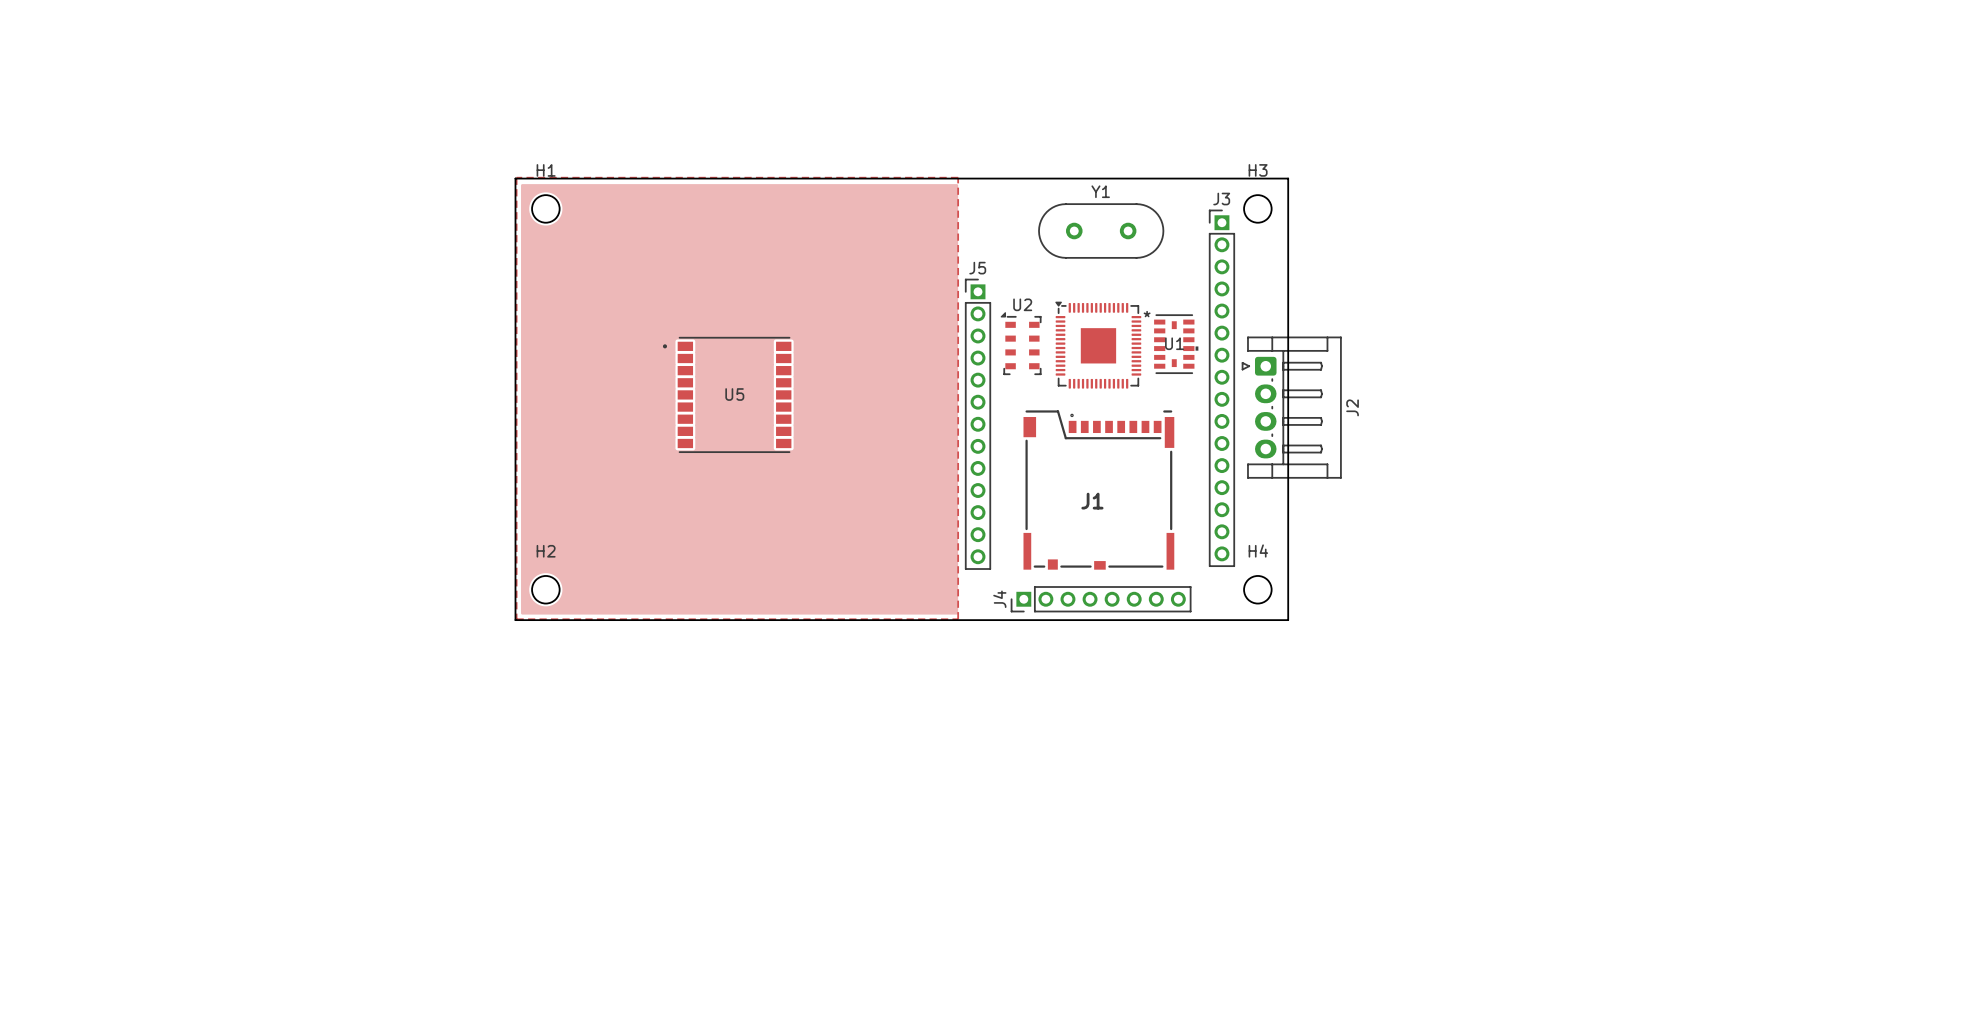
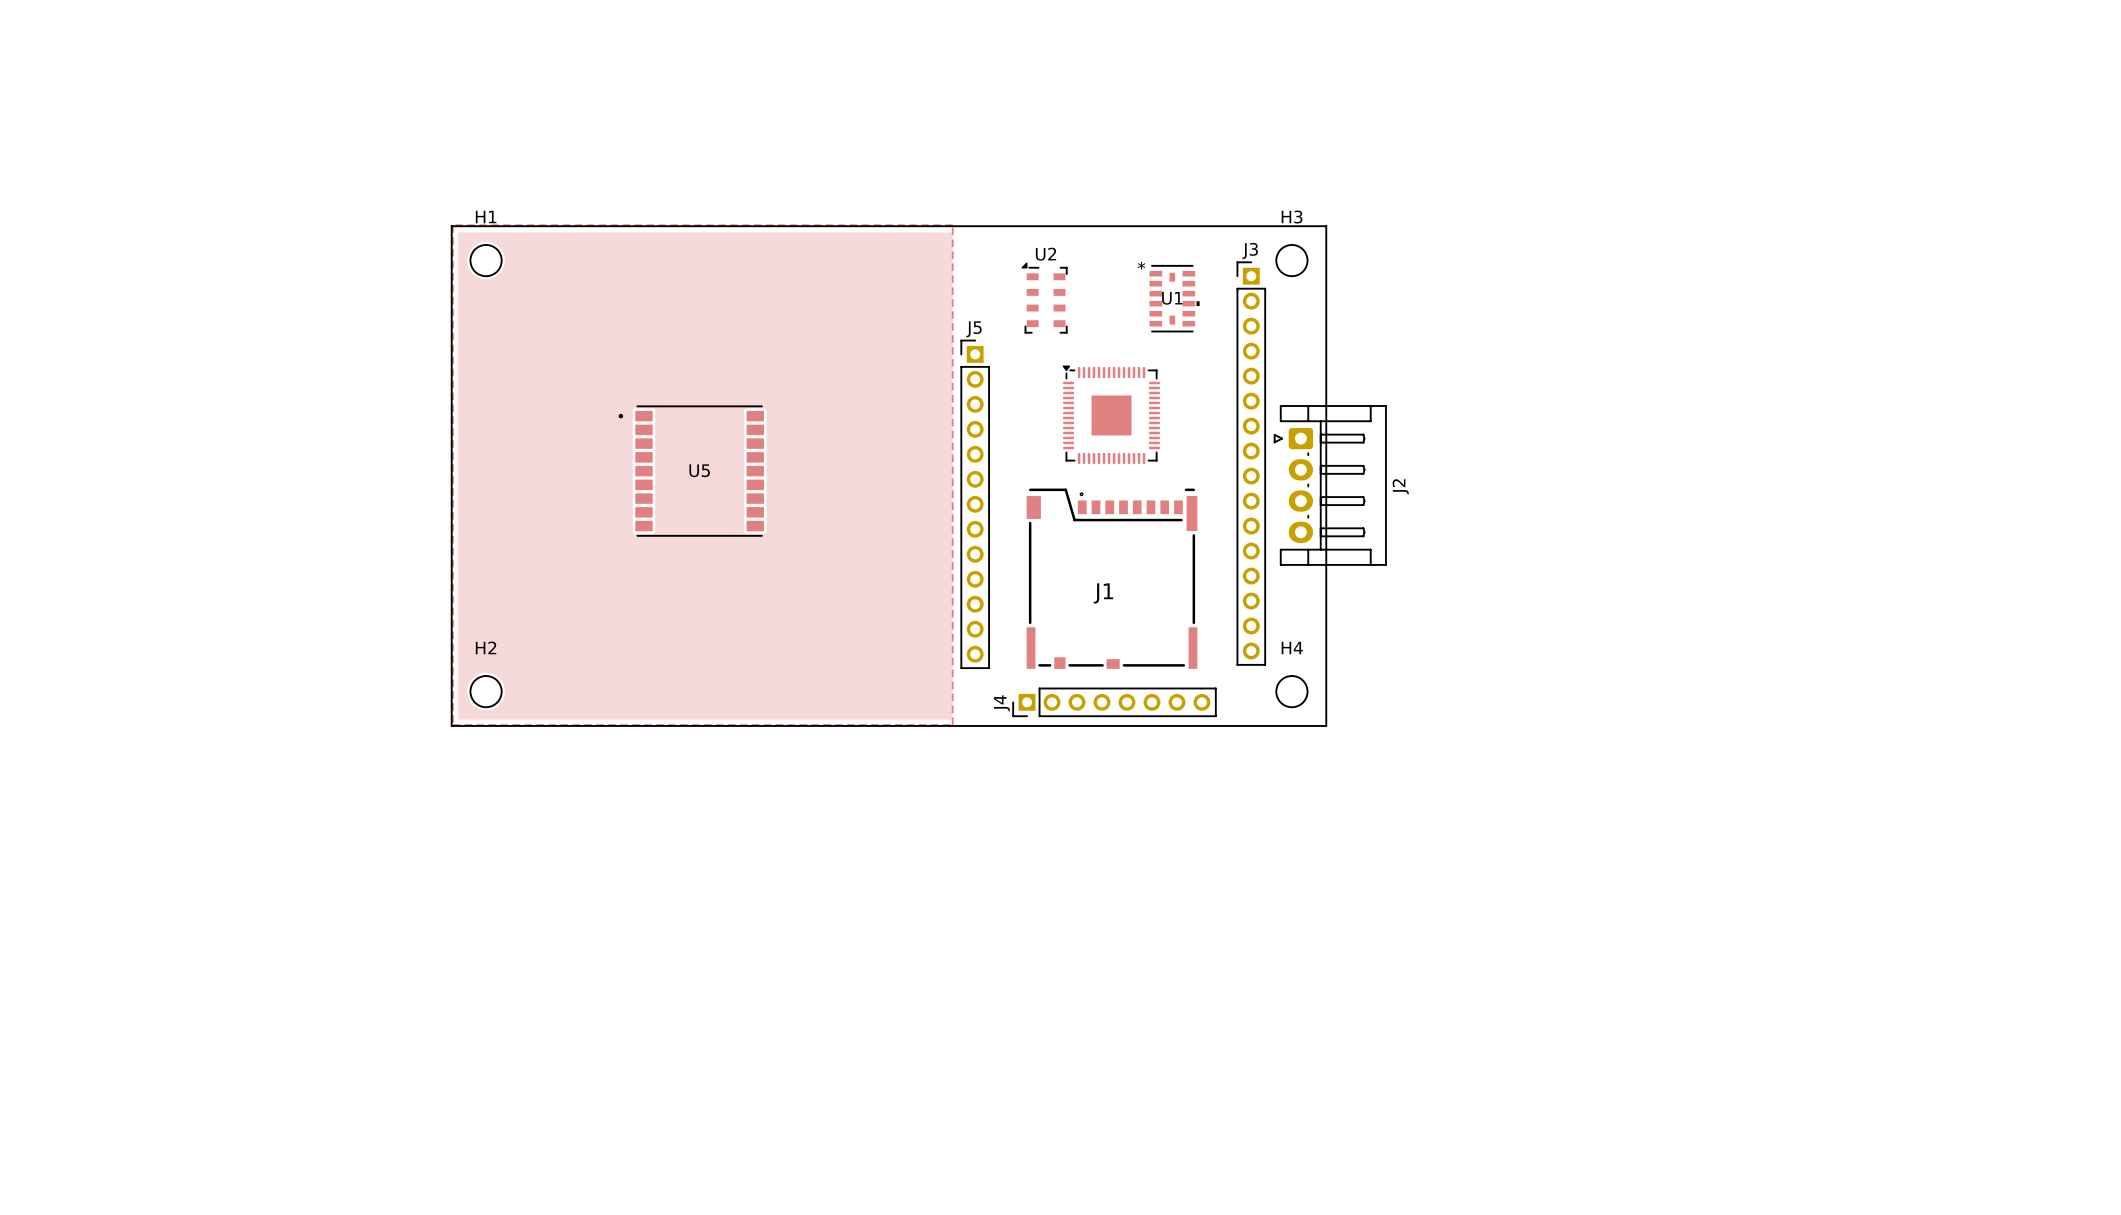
Y1: (1101, 231) -> none
U2 position: (1021, 343) -> (1044, 297)
U1 position: (1176, 344) -> (1174, 298)

